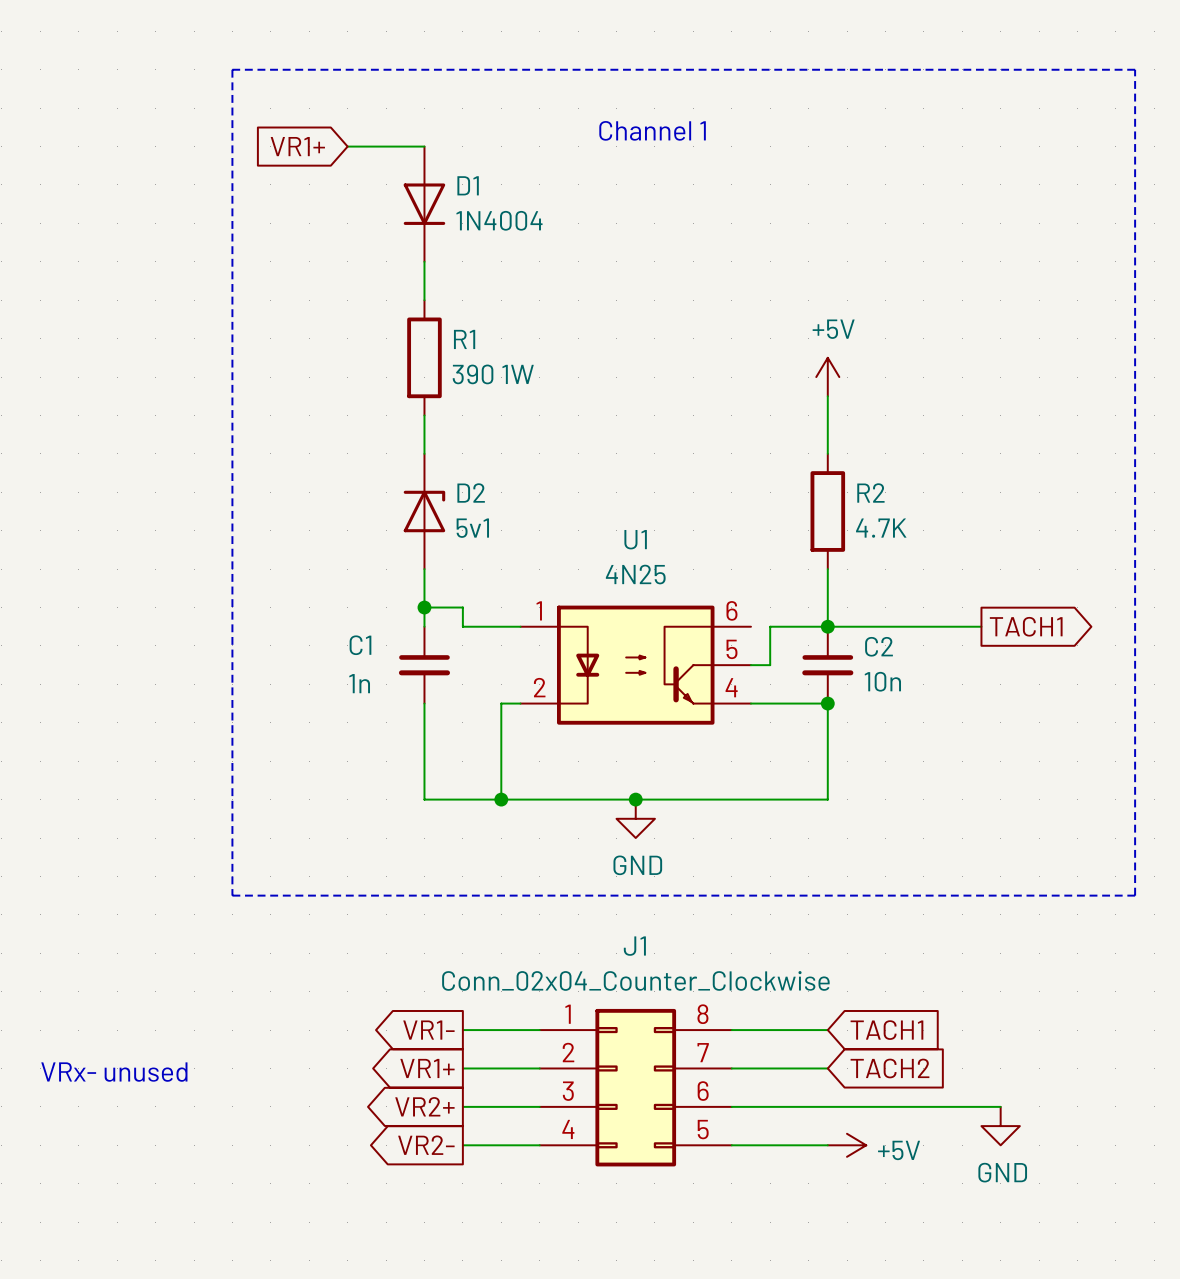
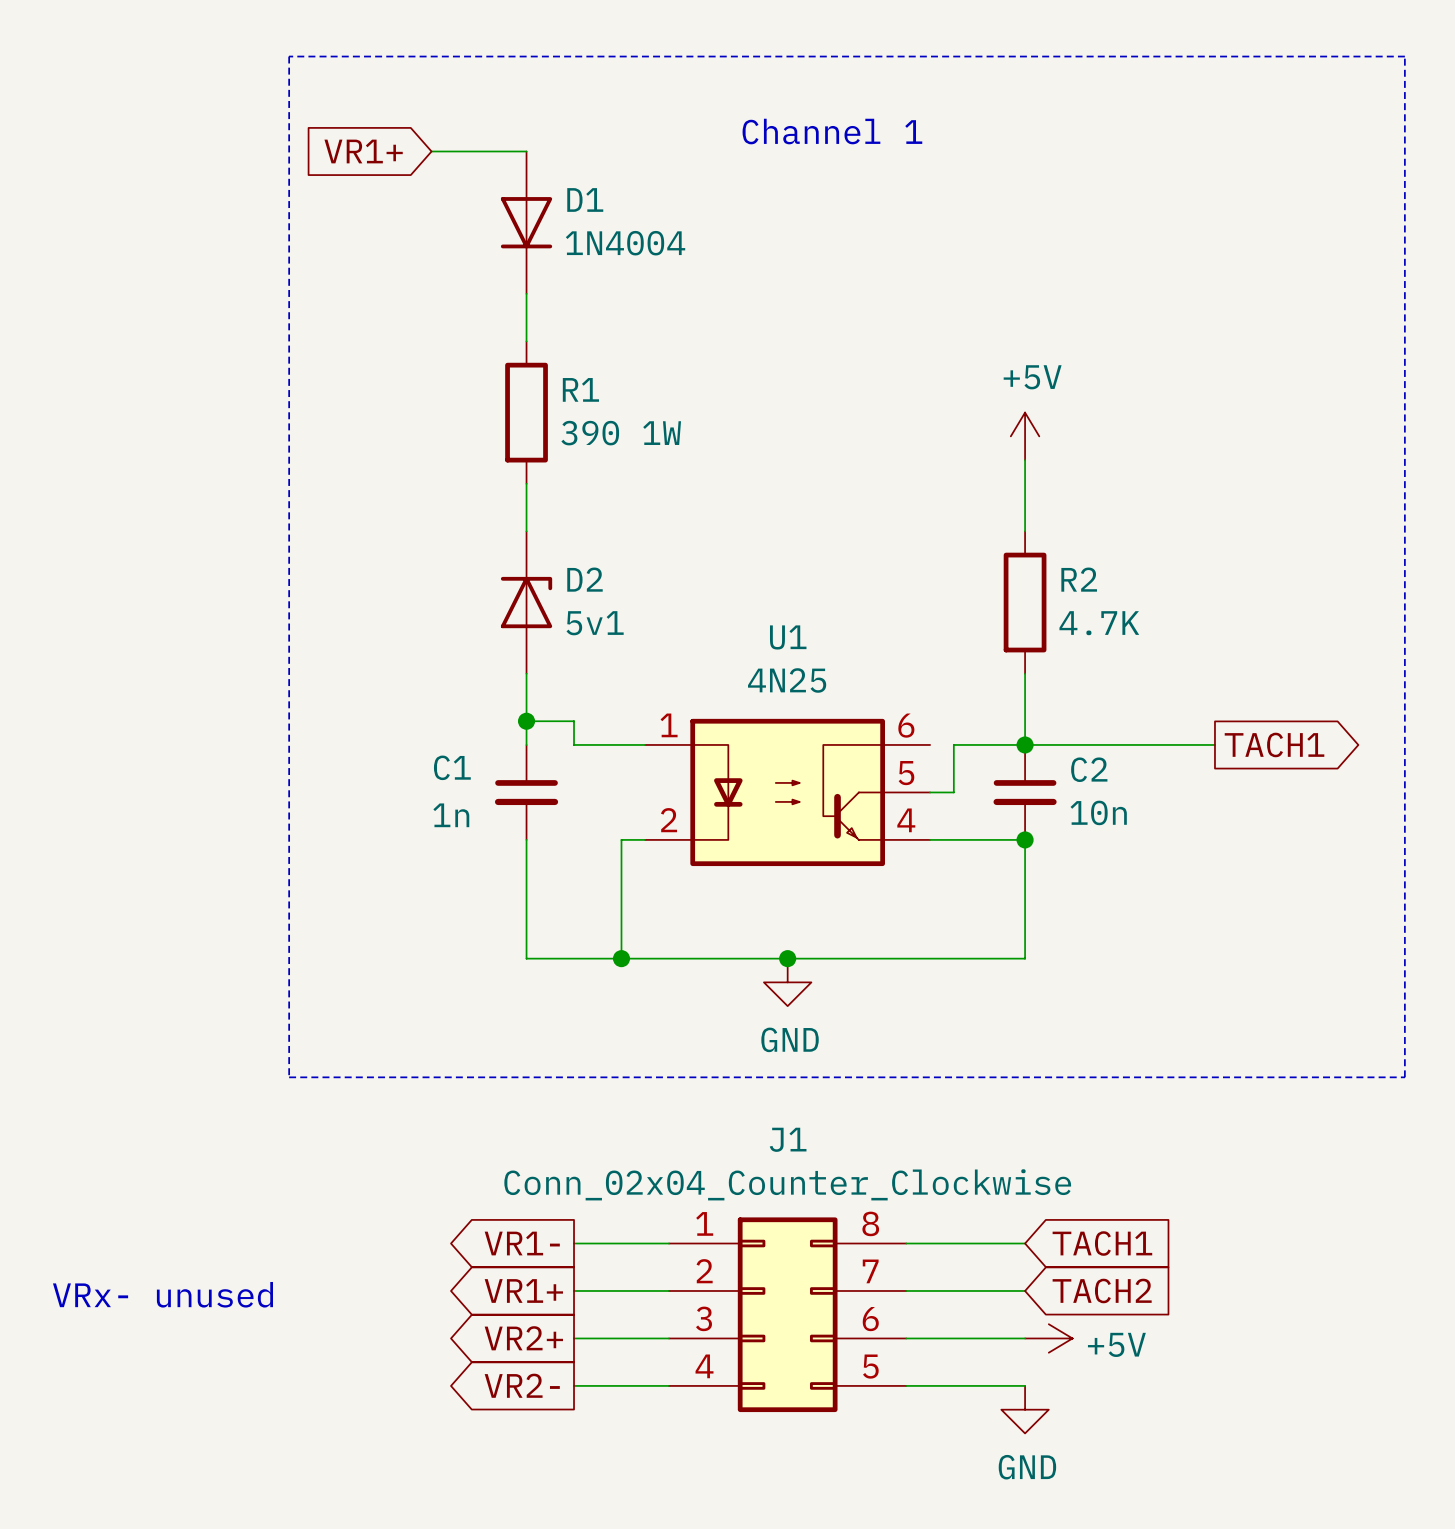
wire: (827, 1106) (1000, 1106) -> none
power symbol position: GND (1000, 1126) -> GND (1025, 1409)
power symbol position: +5V (847, 1145) -> +5V (1048, 1338)

